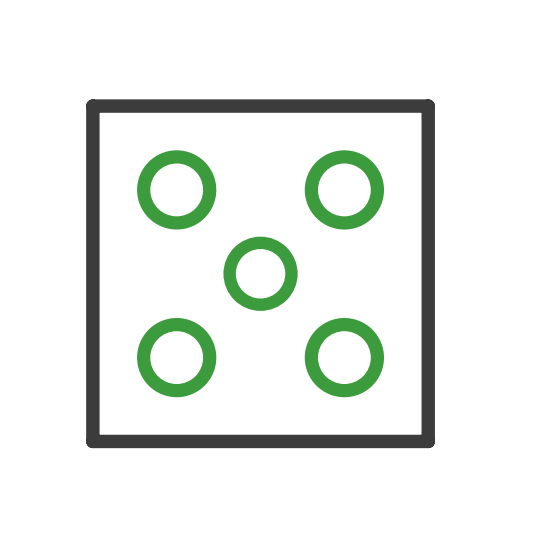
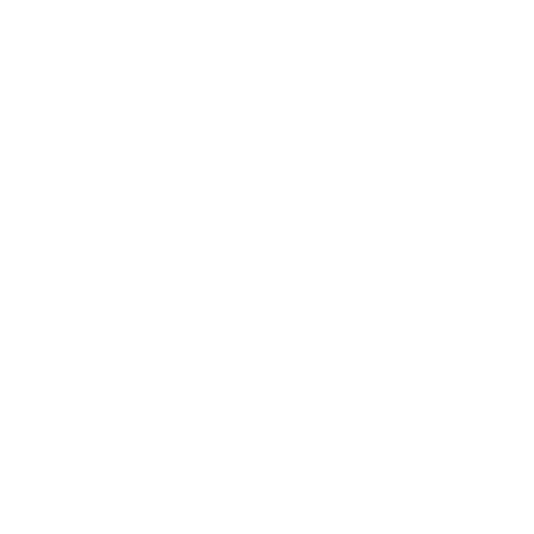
part: (260, 273) -> none

